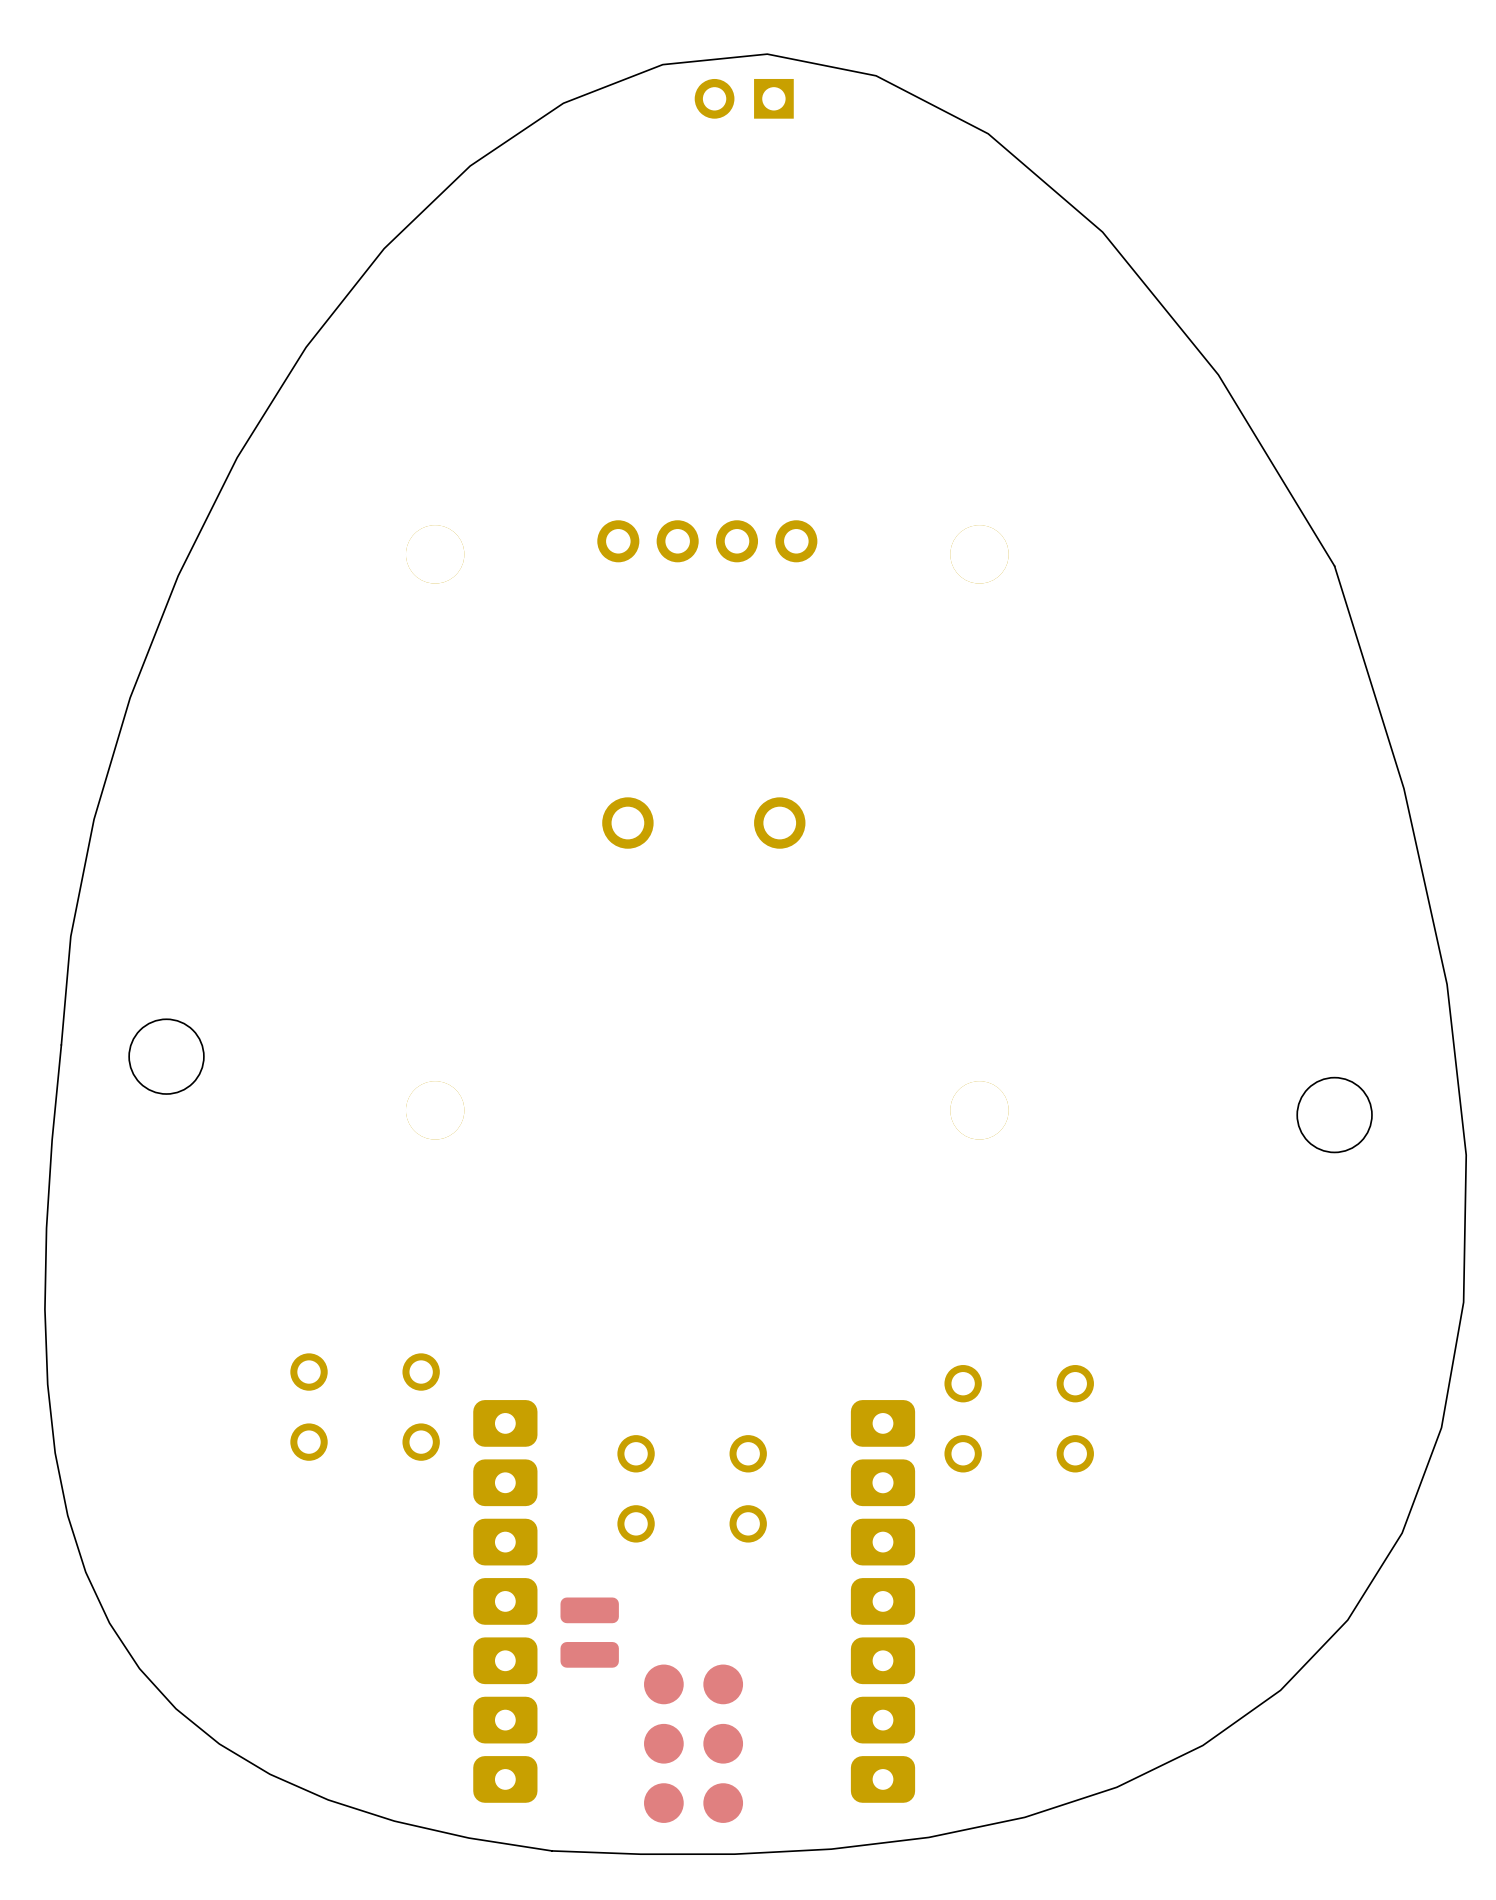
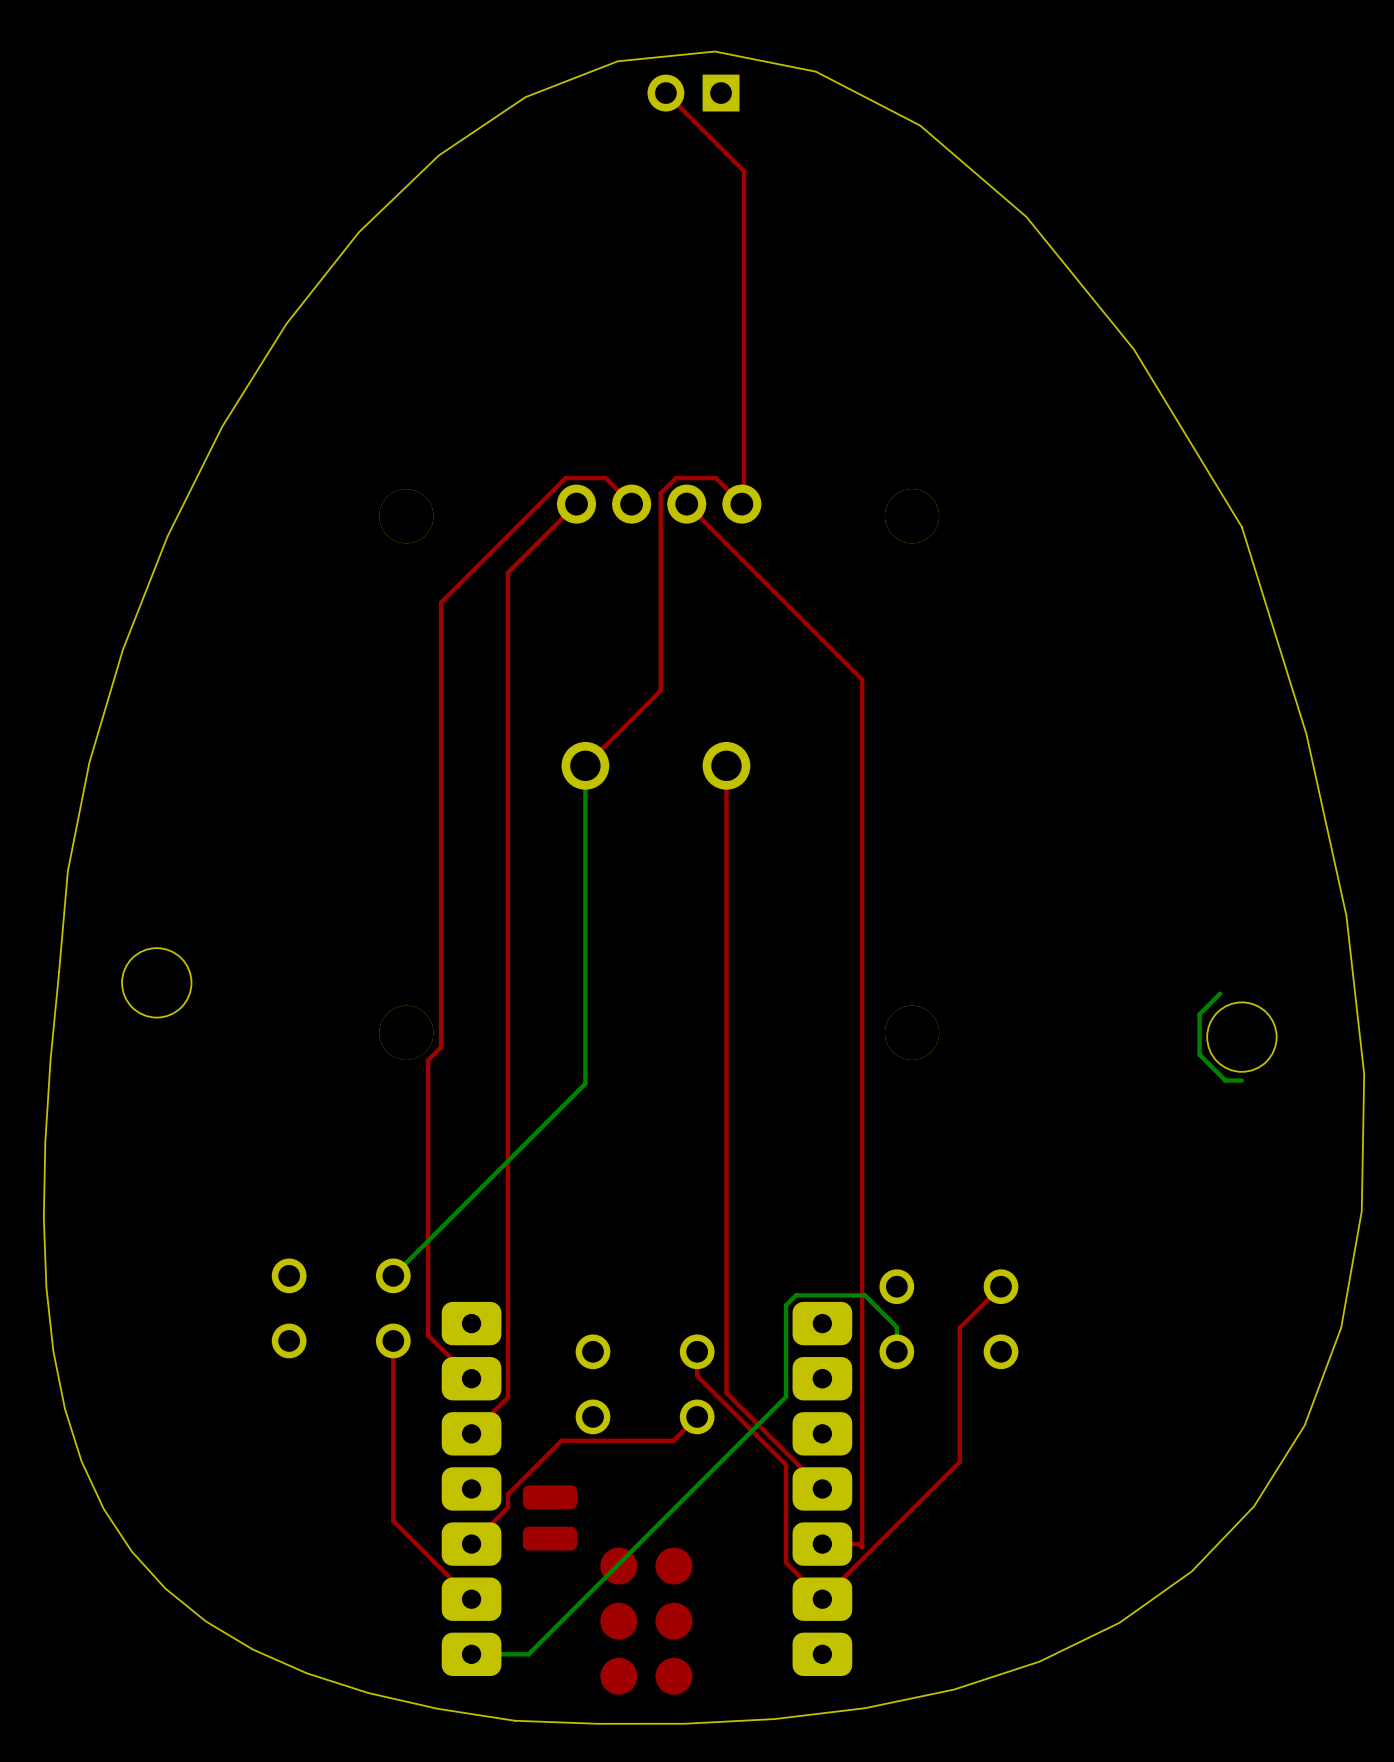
top track: none -> (665, 93) (744, 171) (744, 501) (741, 504) (715, 478) (675, 478) (660, 493) (660, 690) (585, 765)
top track: none -> (576, 504) (507, 572) (507, 1397) (471, 1433)
top track: none -> (631, 504) (605, 478) (565, 478) (441, 602) (441, 1047) (428, 1060) (428, 1335) (471, 1378)
top track: none -> (686, 504) (862, 679) (862, 1547) (859, 1544) (822, 1544)
bottom track: none -> (585, 765) (585, 1083) (393, 1275)
top track: none -> (726, 765) (726, 1393) (822, 1488)
bottom track: none -> (1220, 993) (1199, 1014) (1199, 1054) (1225, 1080) (1241, 1080)
top track: none -> (1001, 1286) (959, 1327) (959, 1461) (822, 1599) (786, 1562) (786, 1464) (697, 1376) (697, 1351)
top track: none -> (393, 1340) (393, 1520) (471, 1599)
bottom track: none -> (896, 1351) (896, 1327) (864, 1295) (796, 1295) (786, 1305) (786, 1396) (528, 1654) (471, 1654)
top track: none -> (697, 1416) (673, 1440) (561, 1440) (507, 1494) (507, 1507) (471, 1544)

